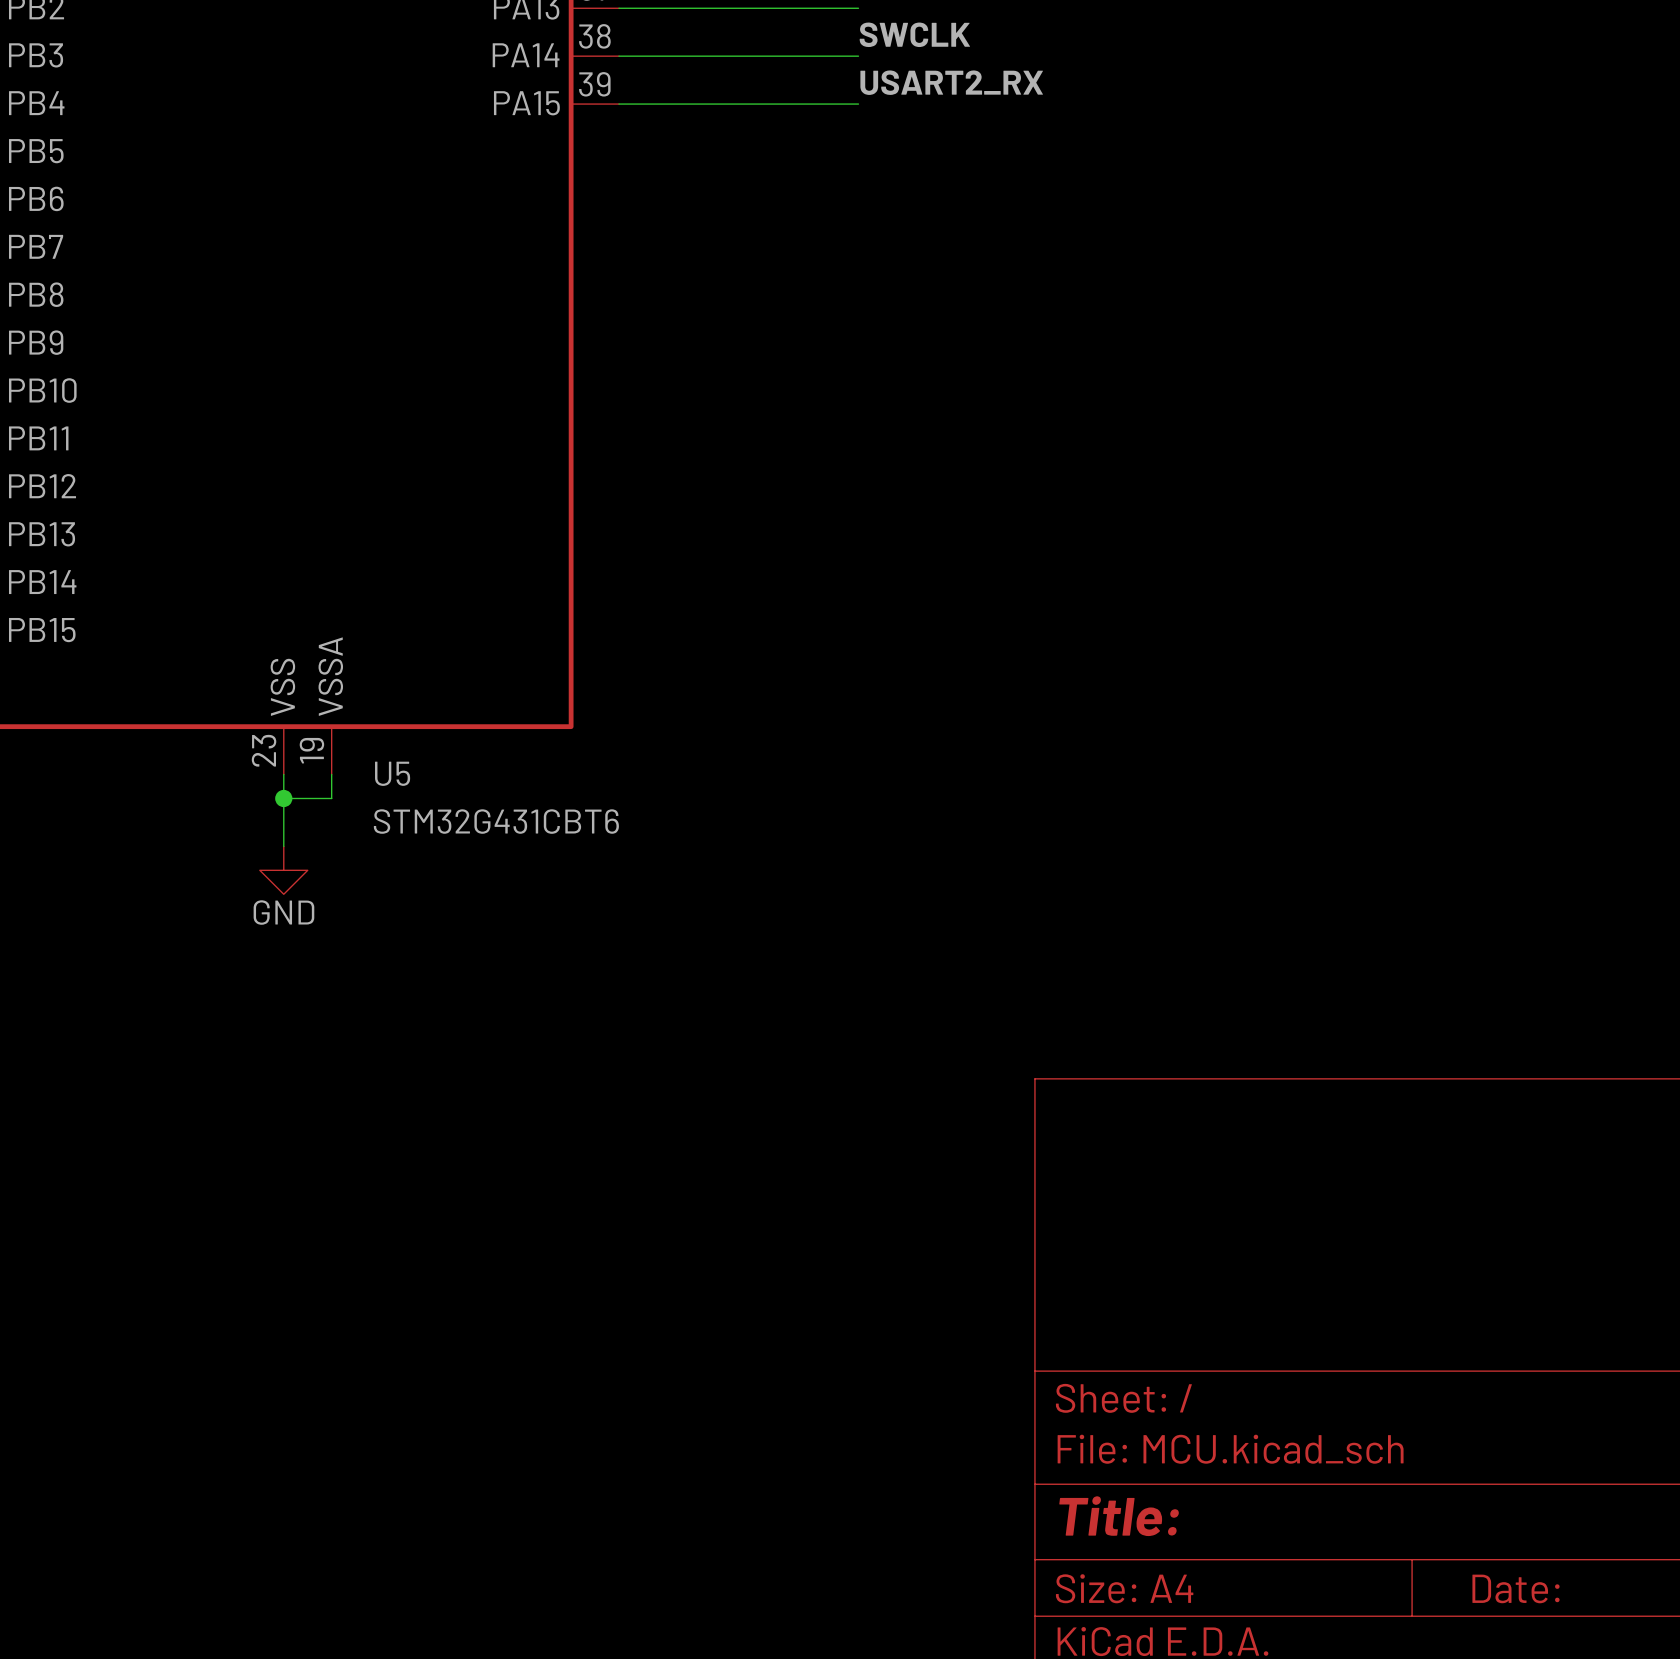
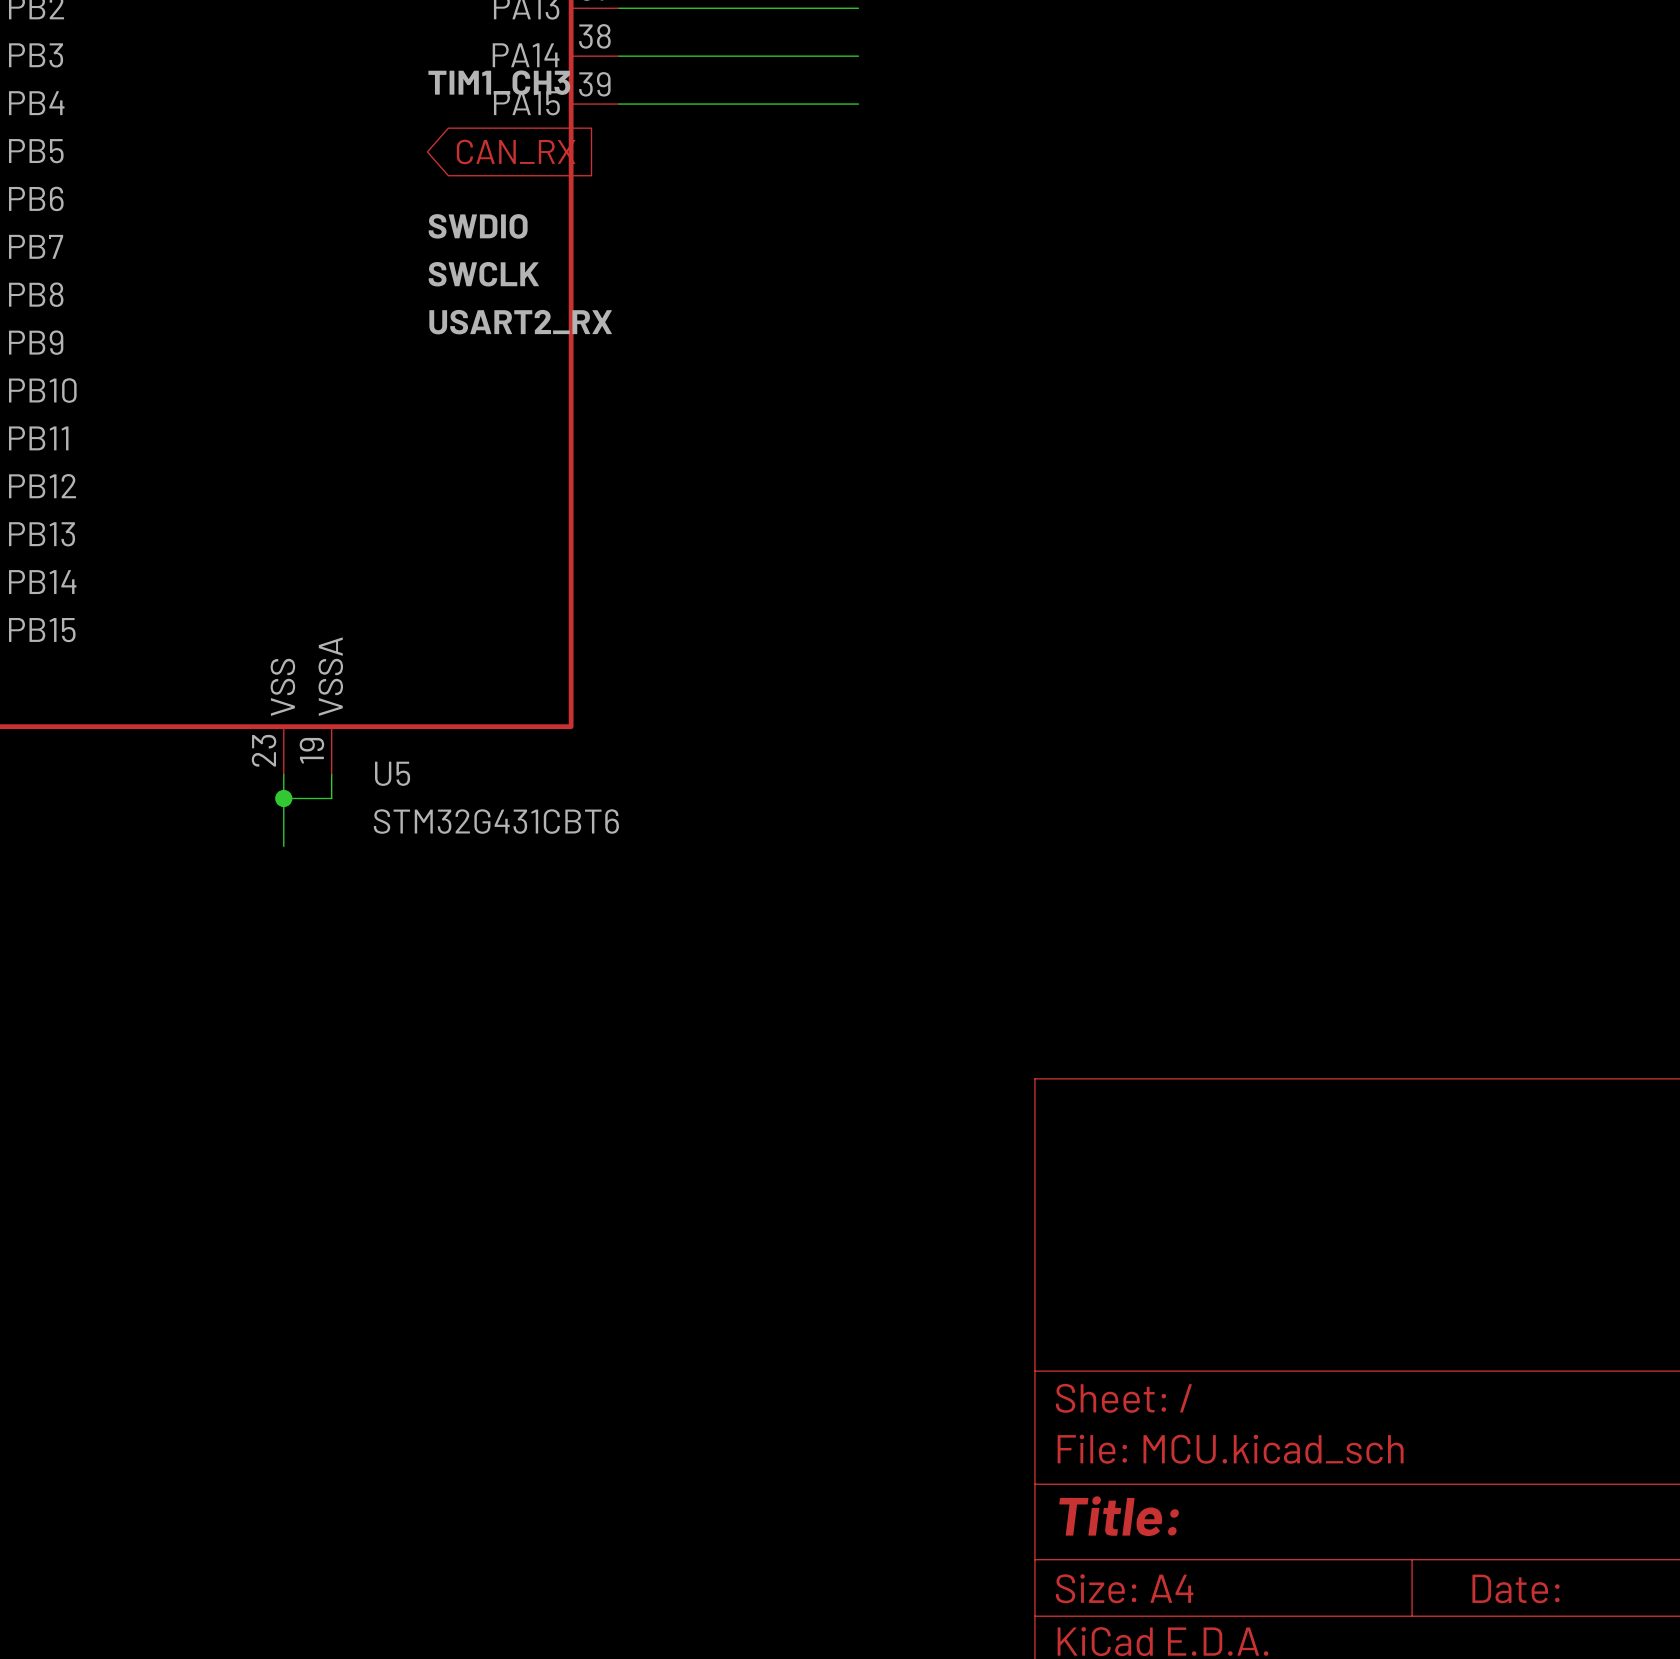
label: SWCLK (914, 34) -> none
label: none -> TIM1_CH3 (499, 82)
label: USART2_RX (951, 82) -> none
global label: none -> CAN_RX (516, 151)
label: none -> SWDIO (478, 226)
label: none -> SWCLK (483, 274)
label: none -> USART2_RX (520, 322)
power symbol: GND (283, 870) -> none

